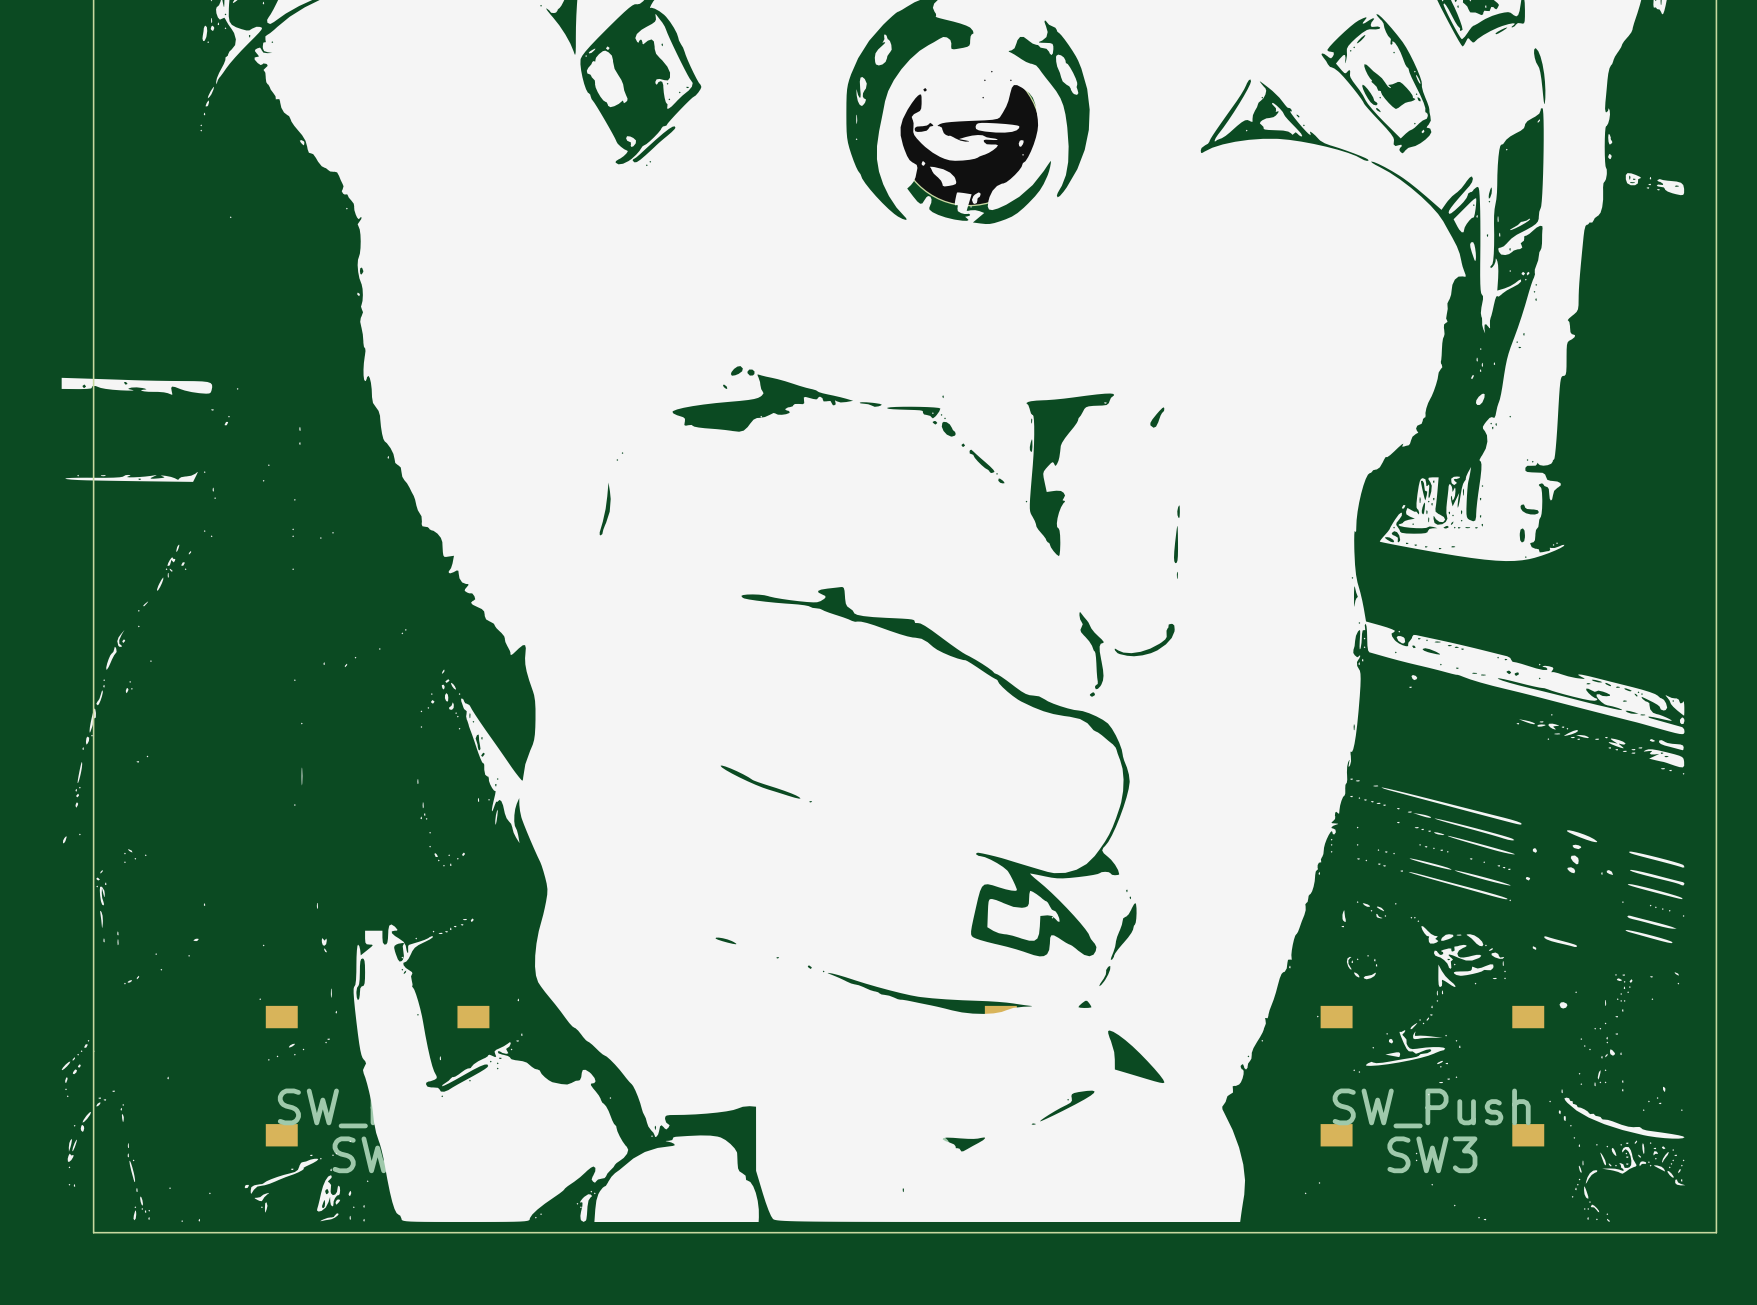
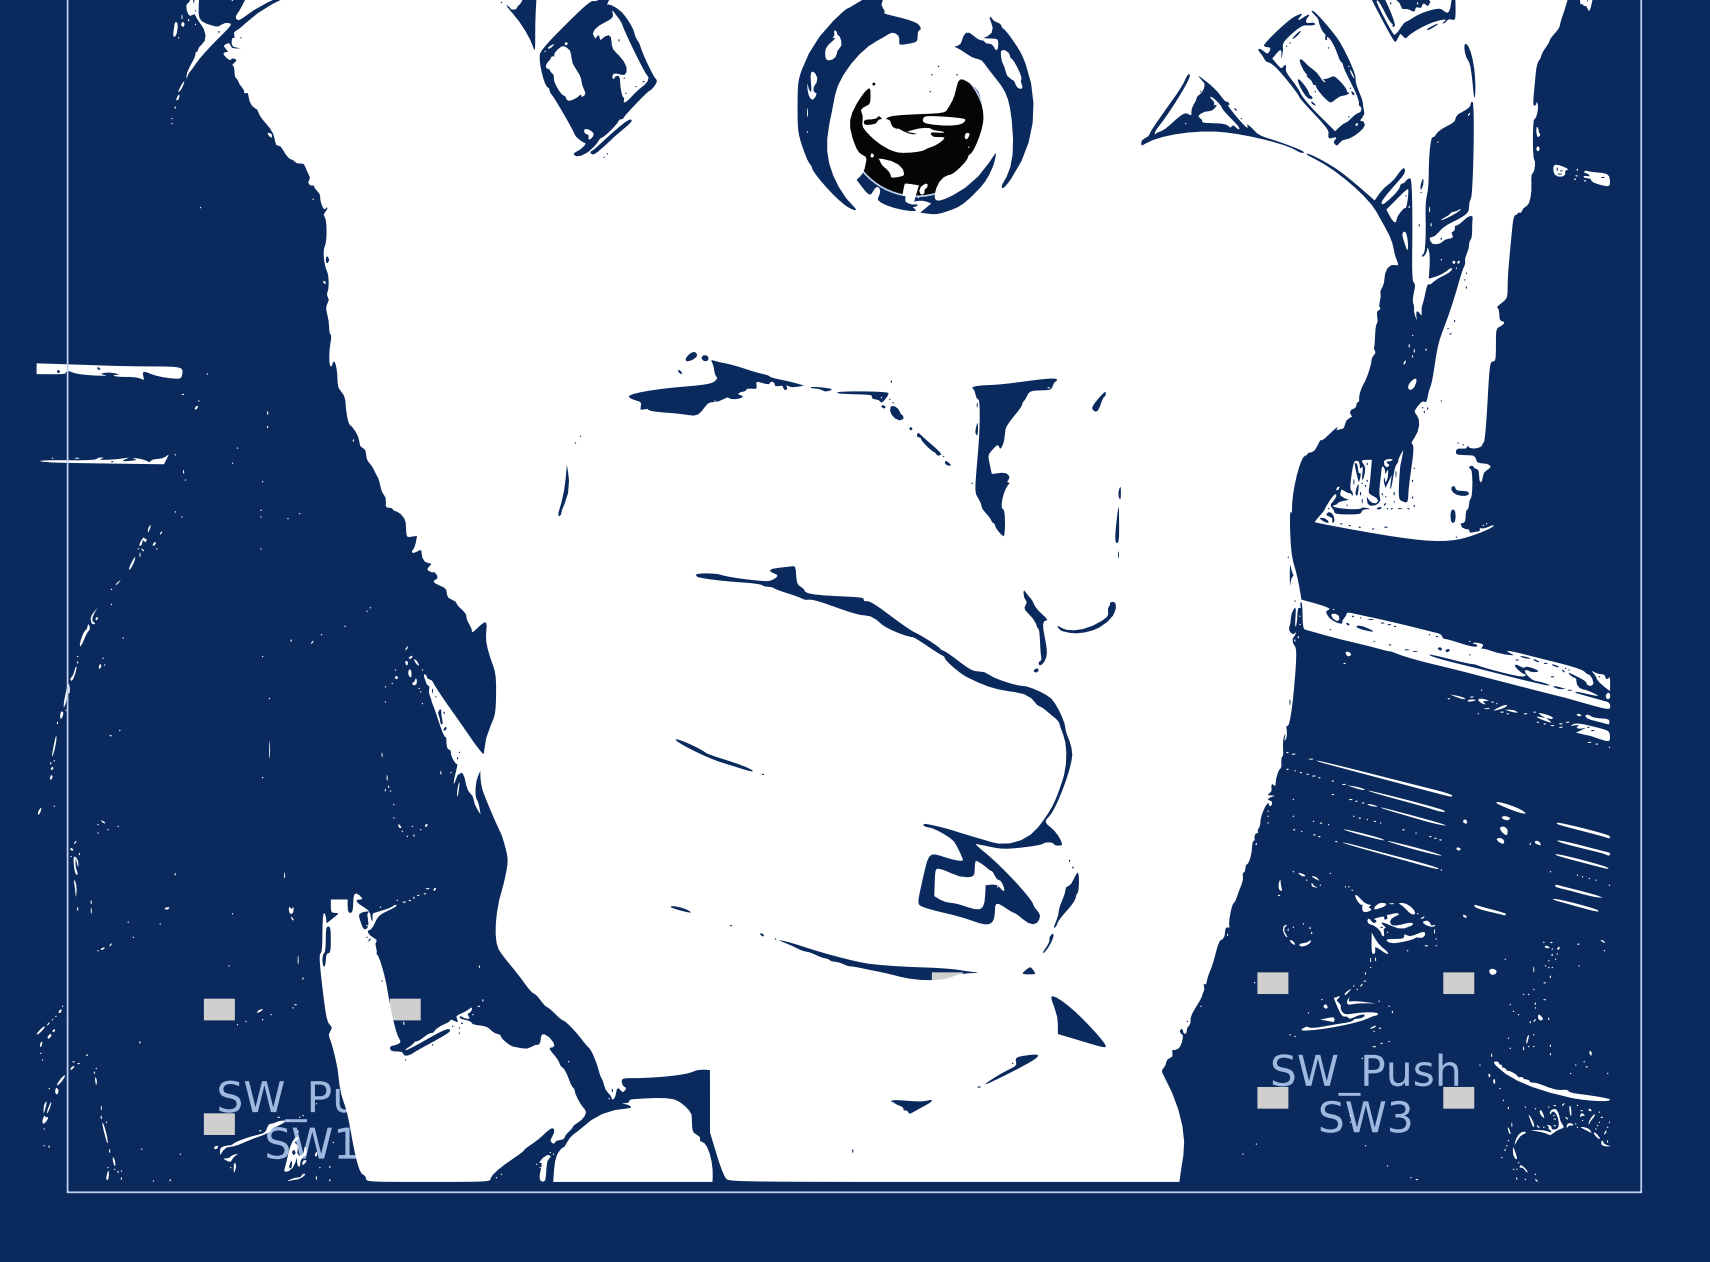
SW1 position: (377, 1076) -> (312, 1066)

